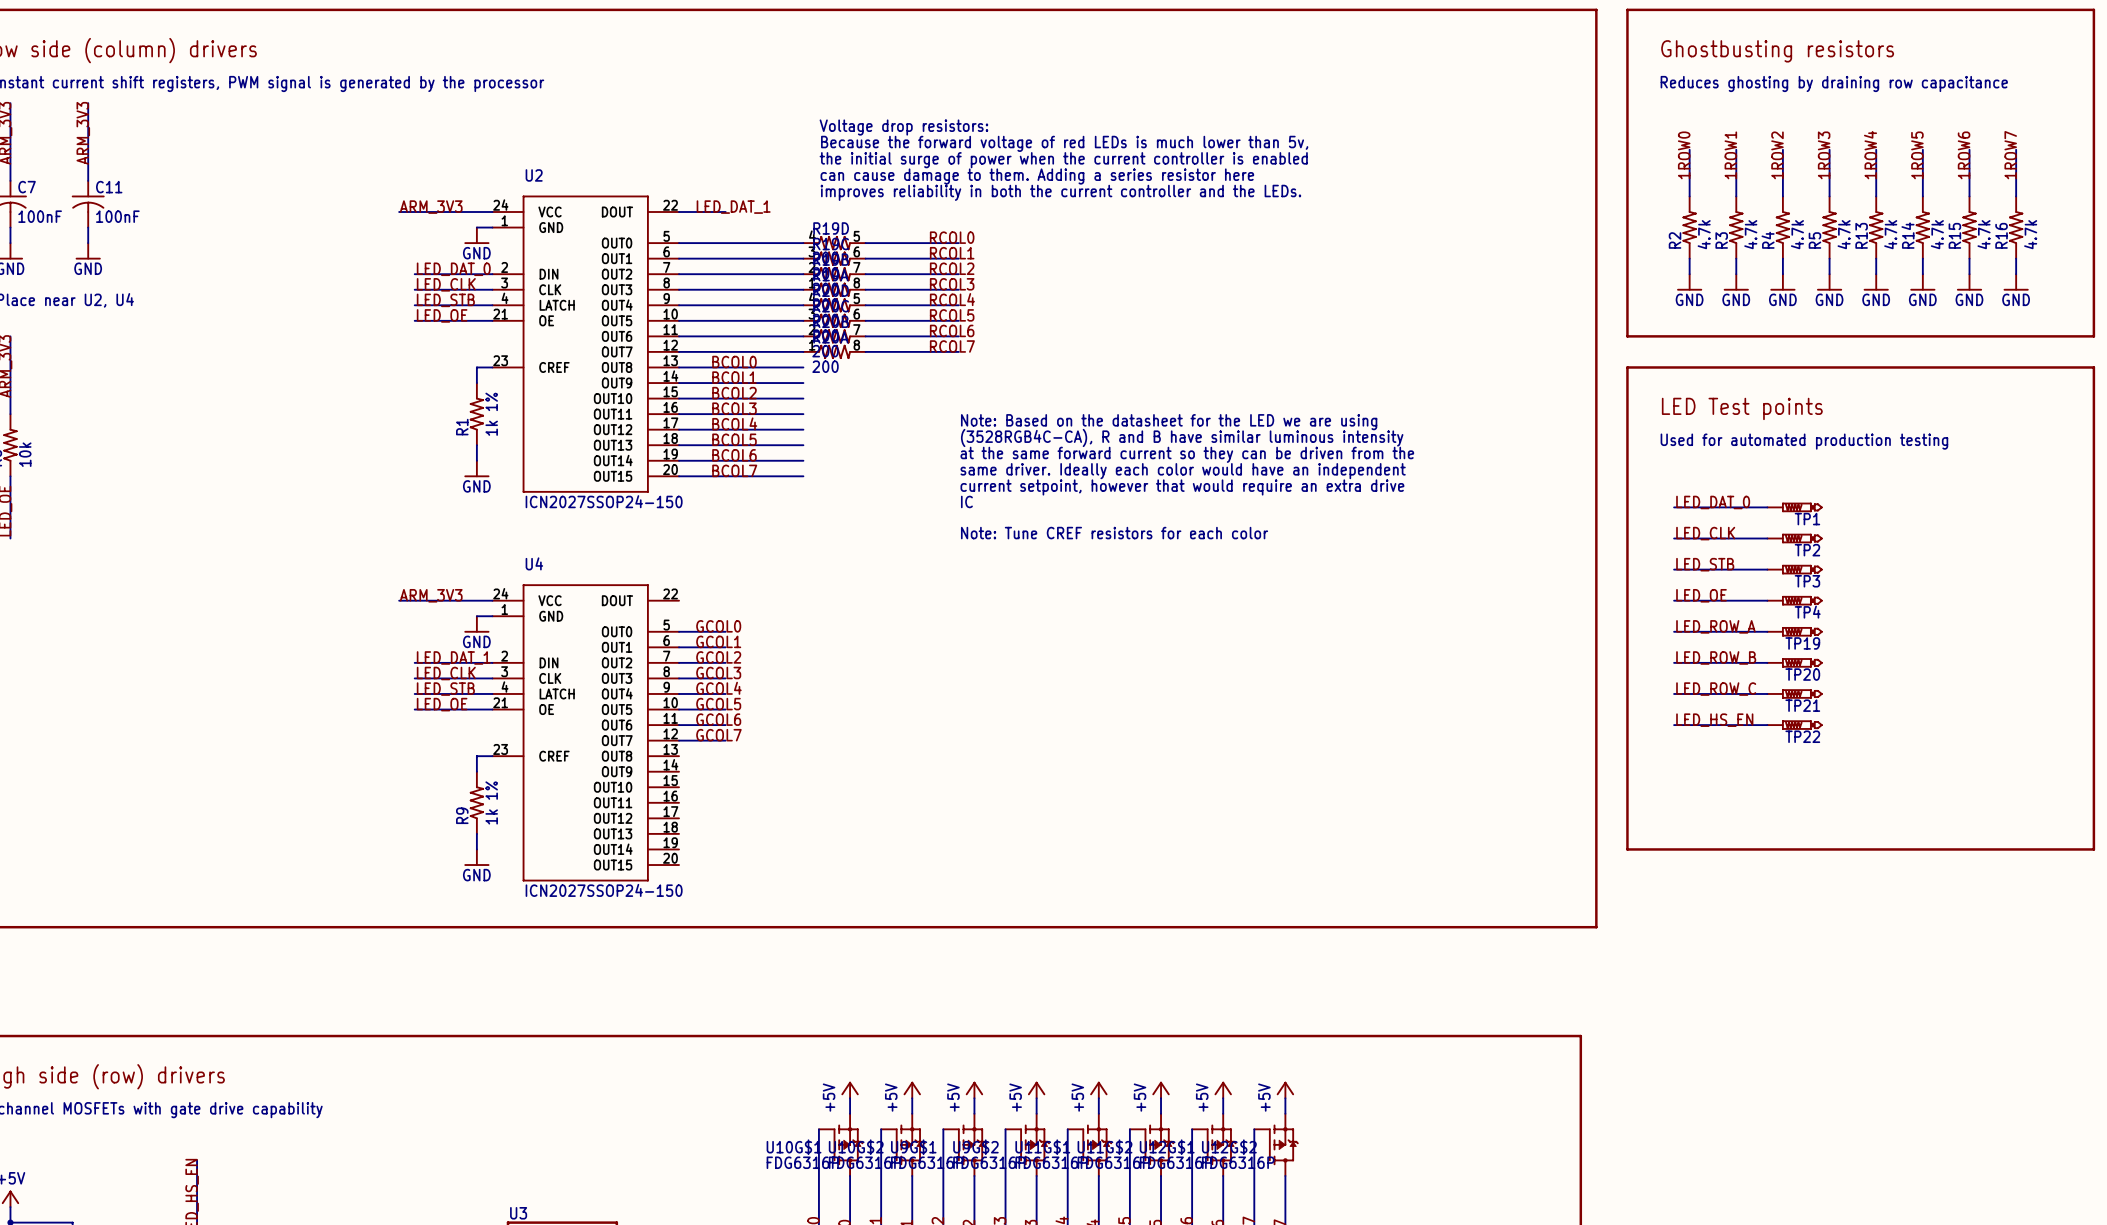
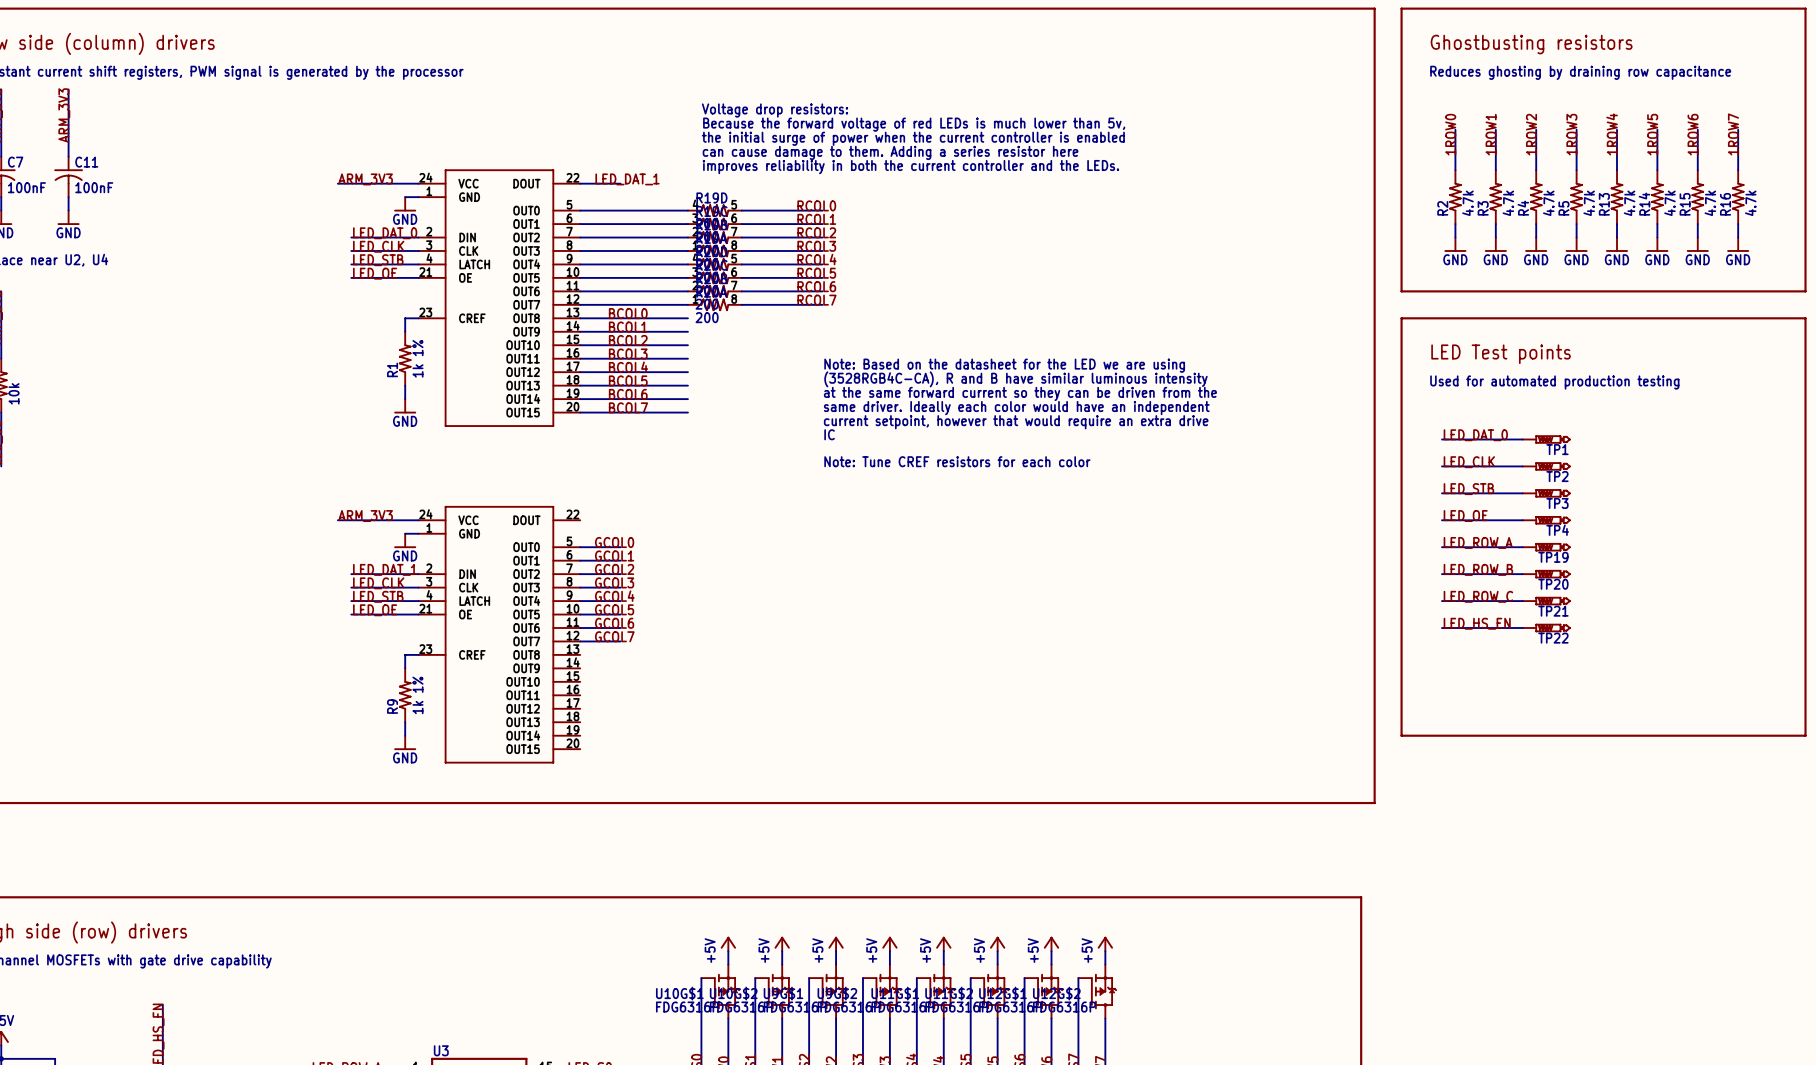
U2 name: U2 (534, 175) -> none
U2 value: ICN2027SSOP24-150 (604, 501) -> none
U4 name: U4 (534, 563) -> none
U4 value: ICN2027SSOP24-150 (604, 890) -> none

